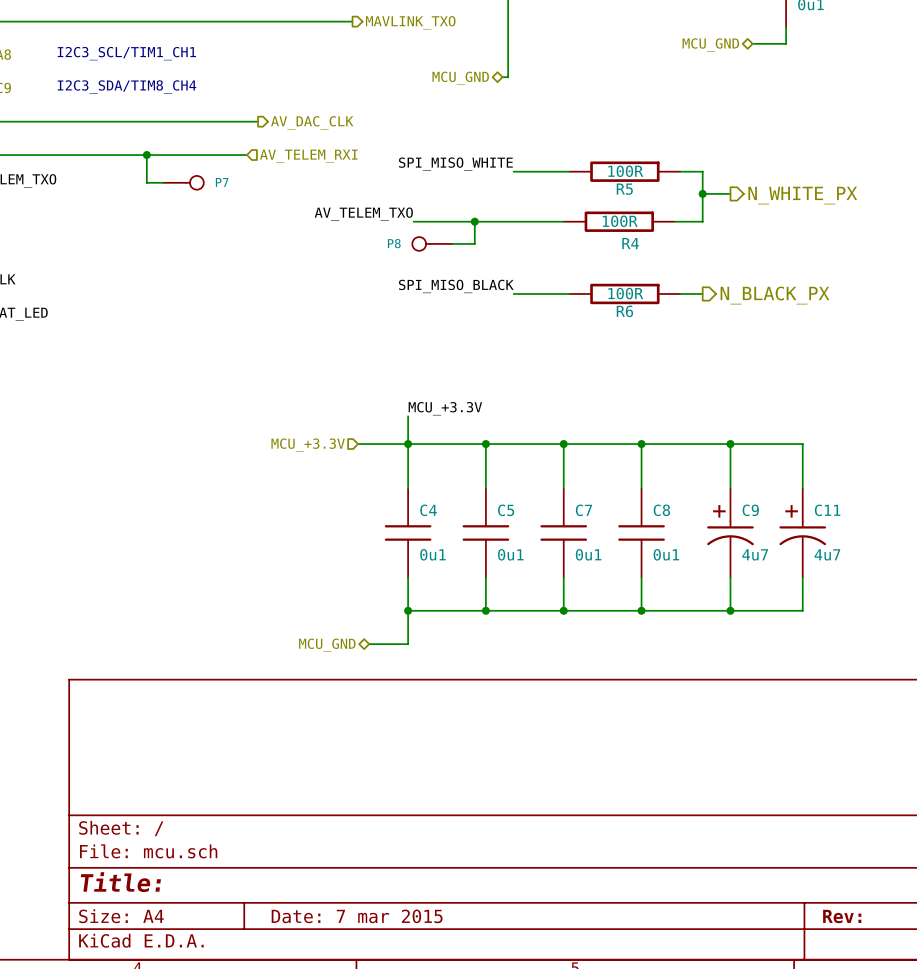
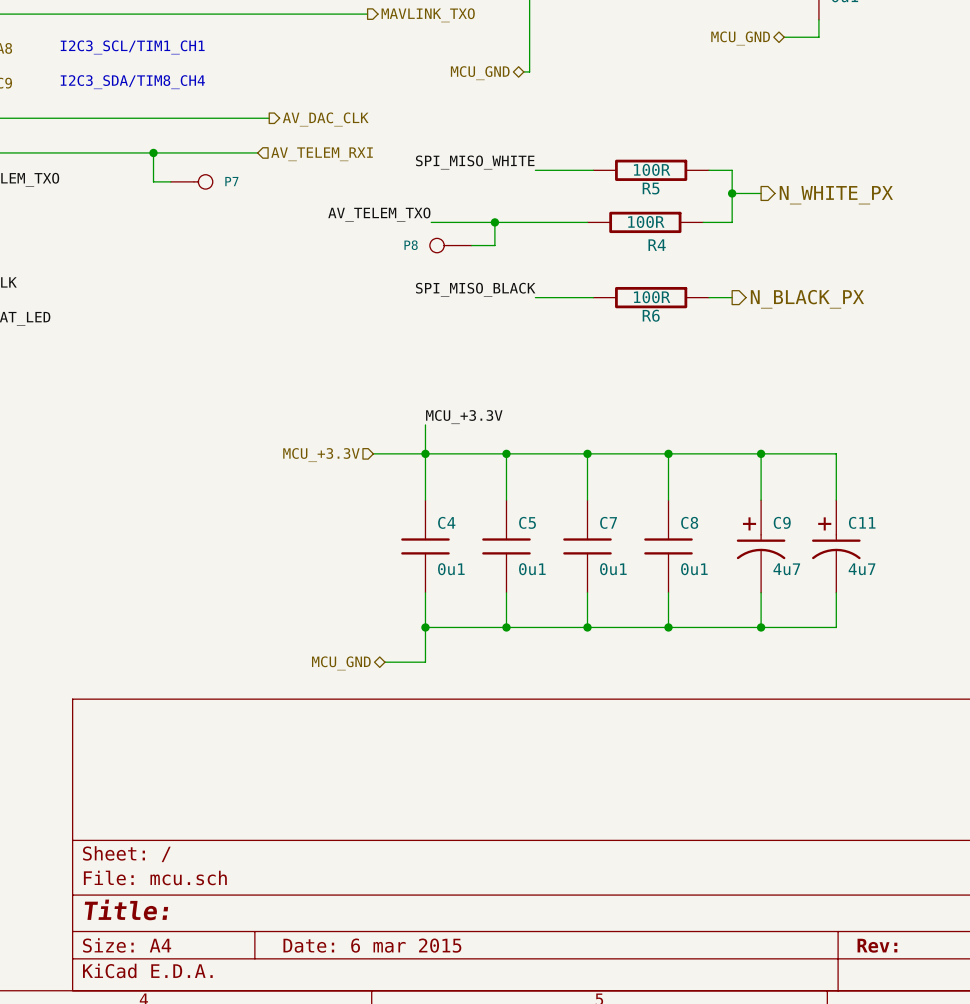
title block: Date: 7 mar 2015 (357, 916) -> Date: 6 mar 2015 (372, 945)

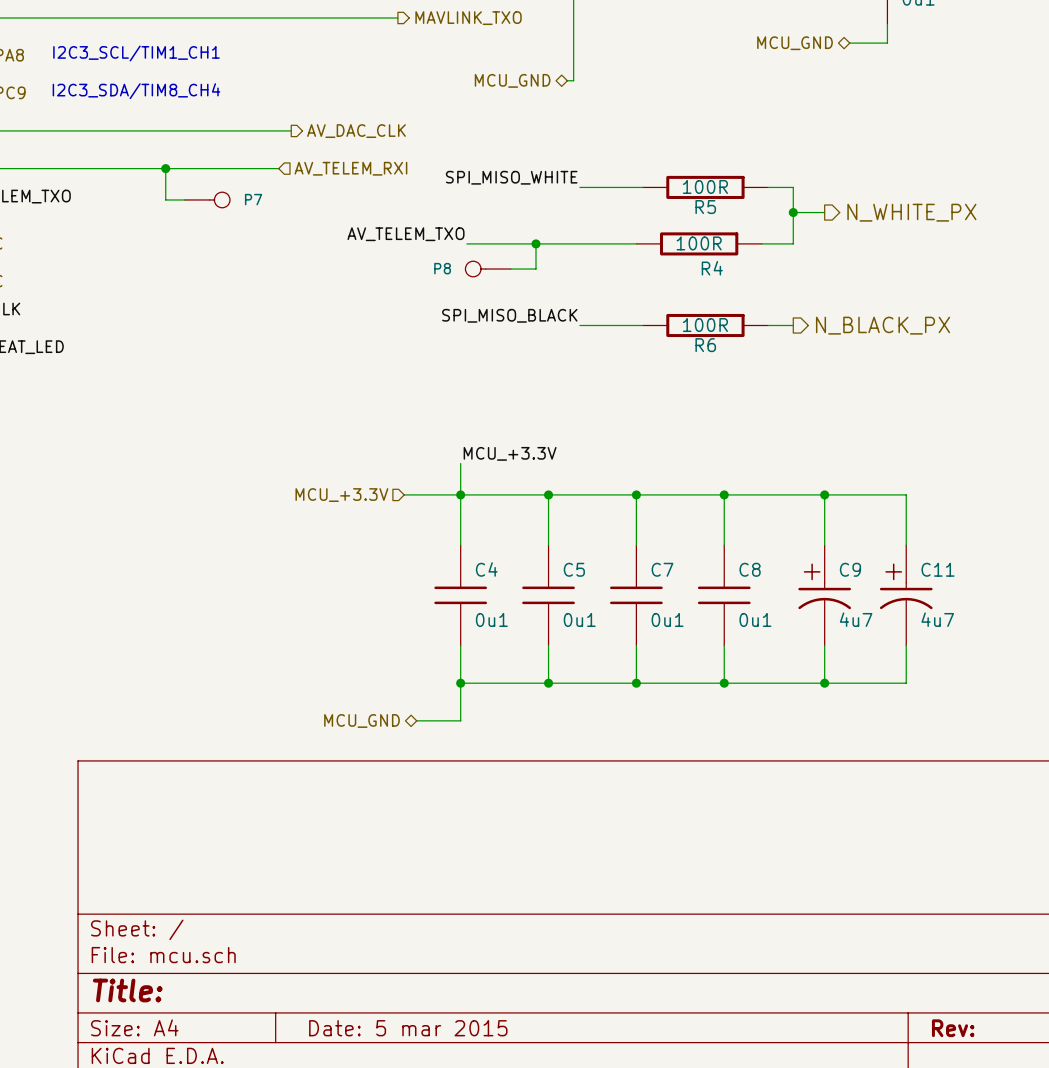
title block: Date: 6 mar 2015 (372, 945) -> Date: 5 mar 2015 (408, 1028)

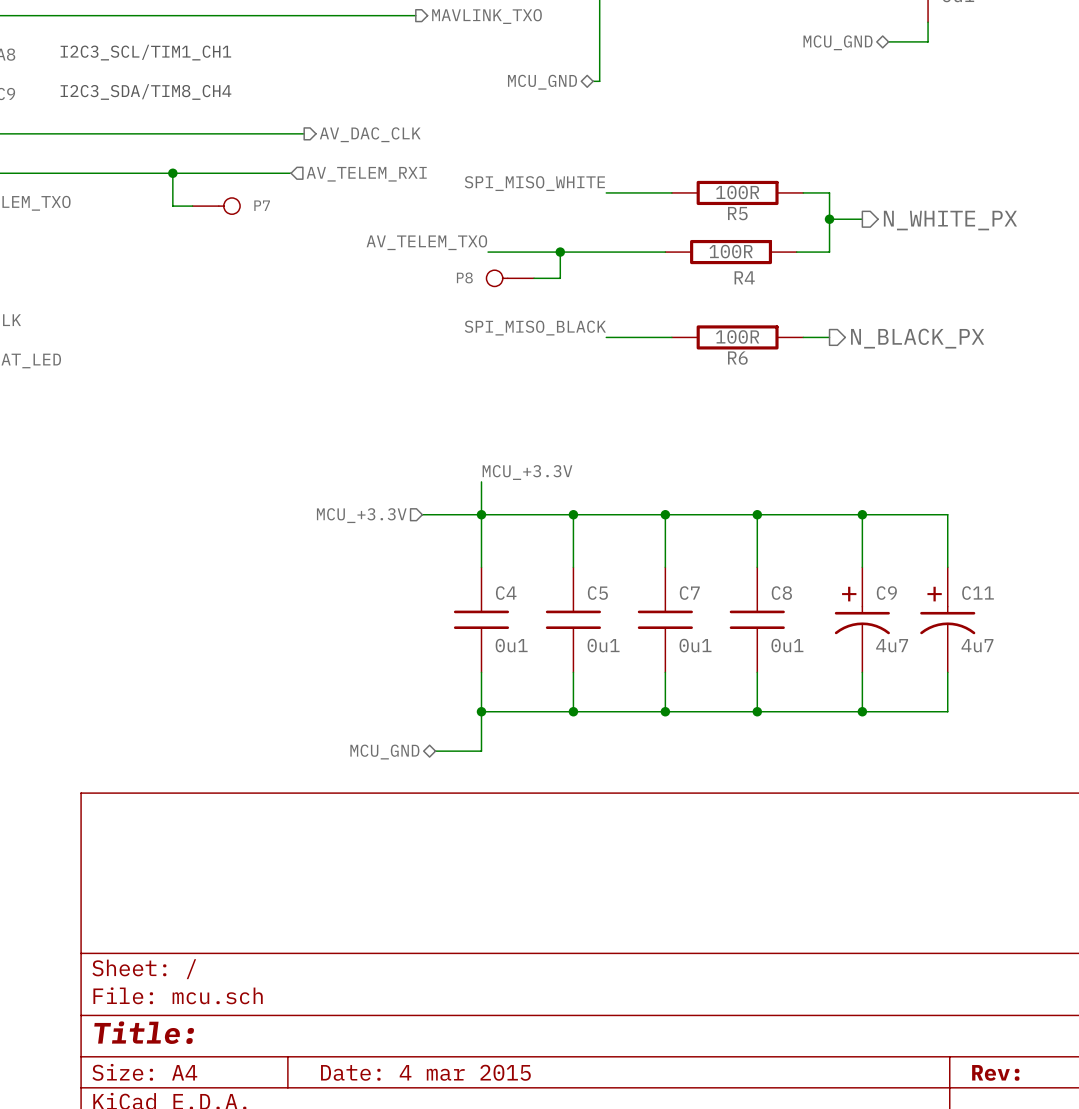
title block: Date: 5 mar 2015 (408, 1028) -> Date: 4 mar 2015 (425, 1072)

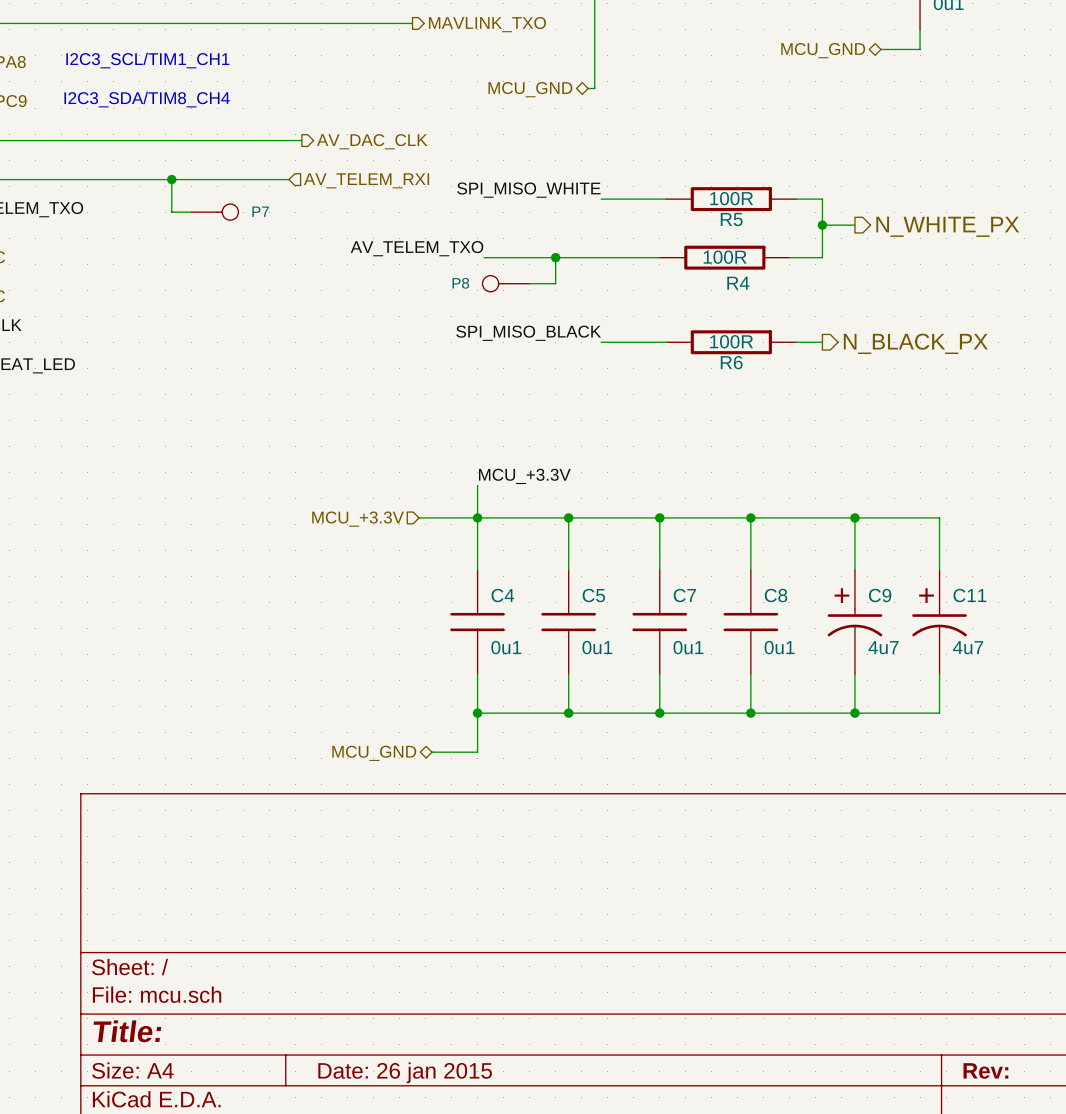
title block: Date: 4 mar 2015 (425, 1072) -> Date: 26 jan 2015 (405, 1072)

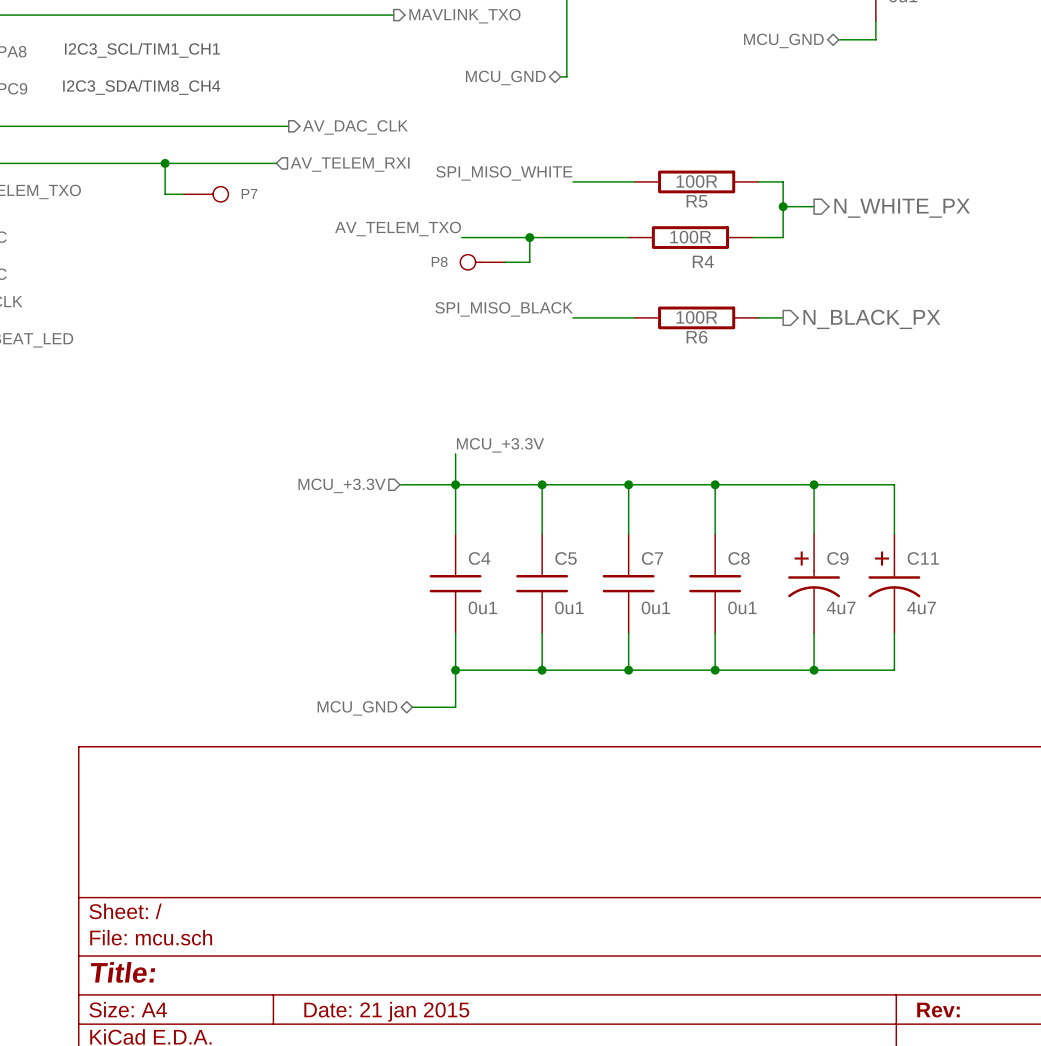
title block: Date: 26 jan 2015 (405, 1072) -> Date: 21 jan 2015 (386, 1011)

